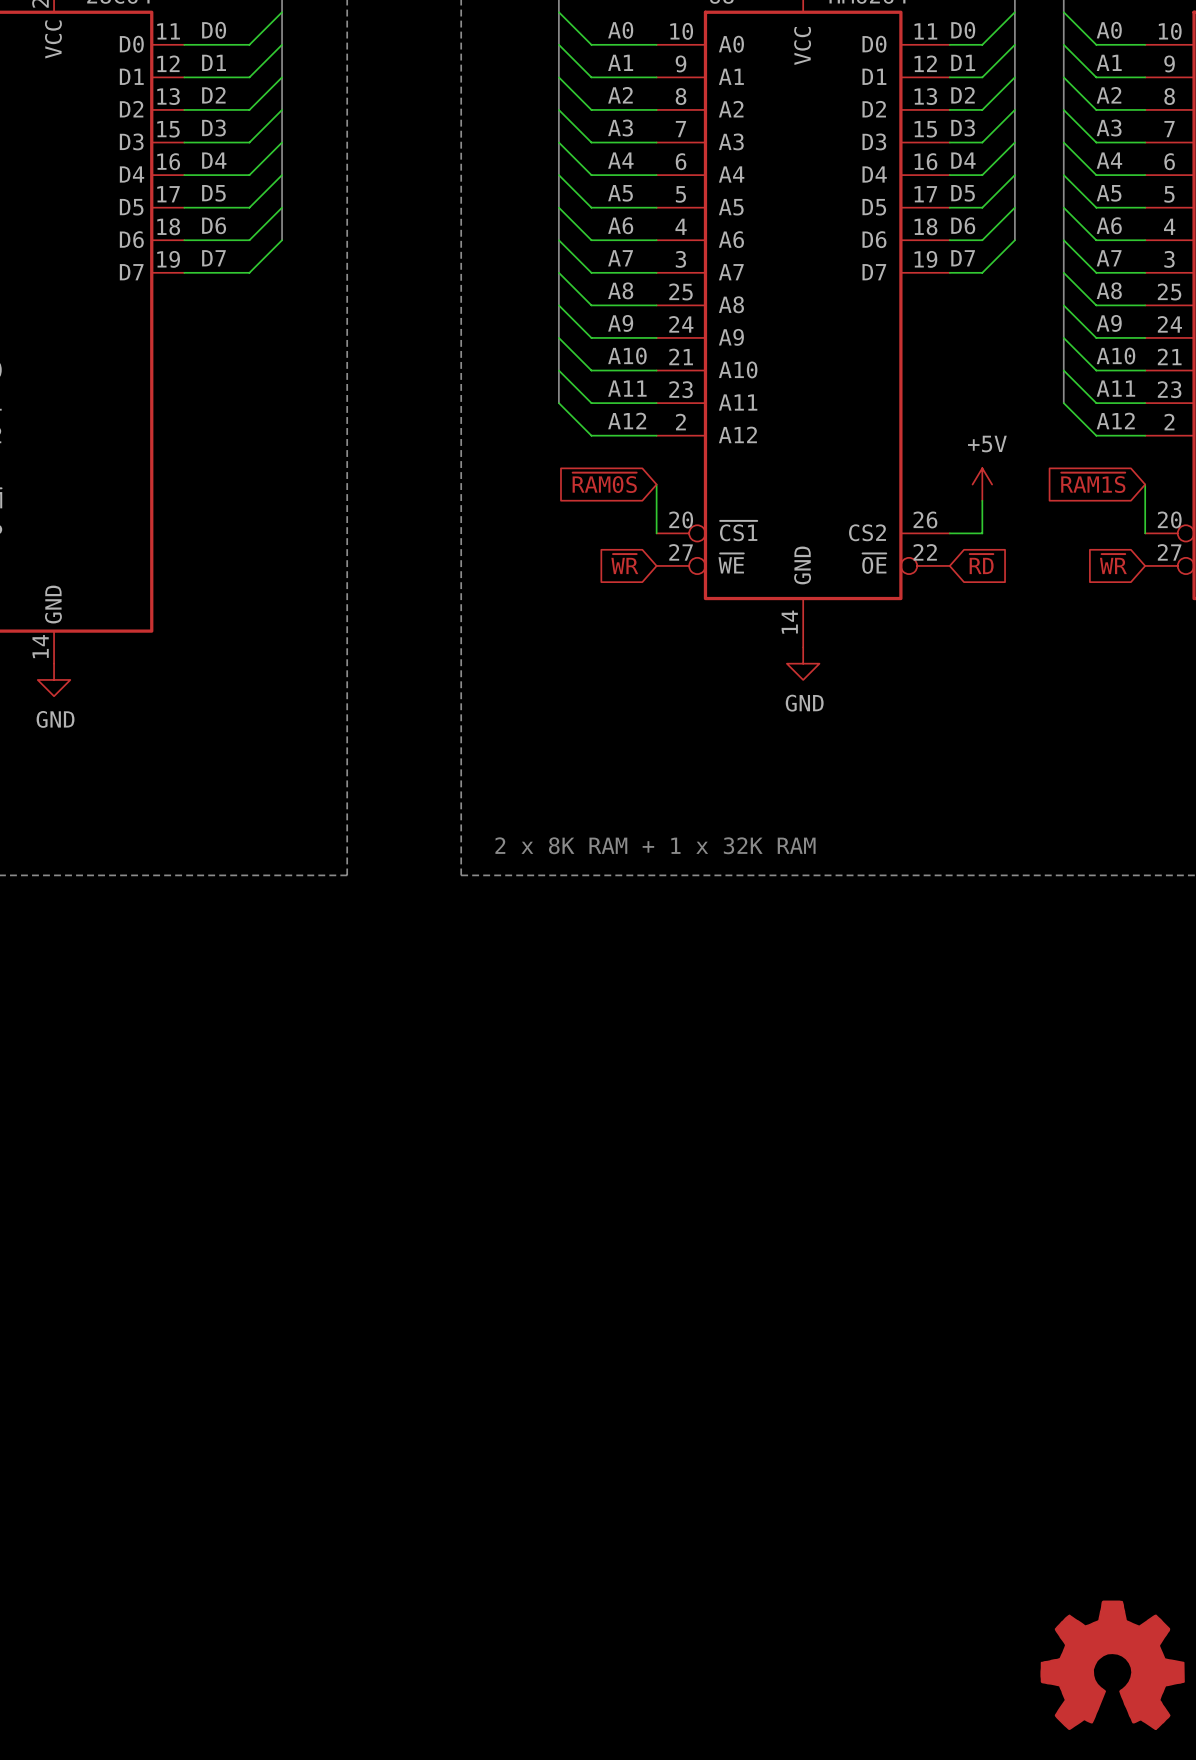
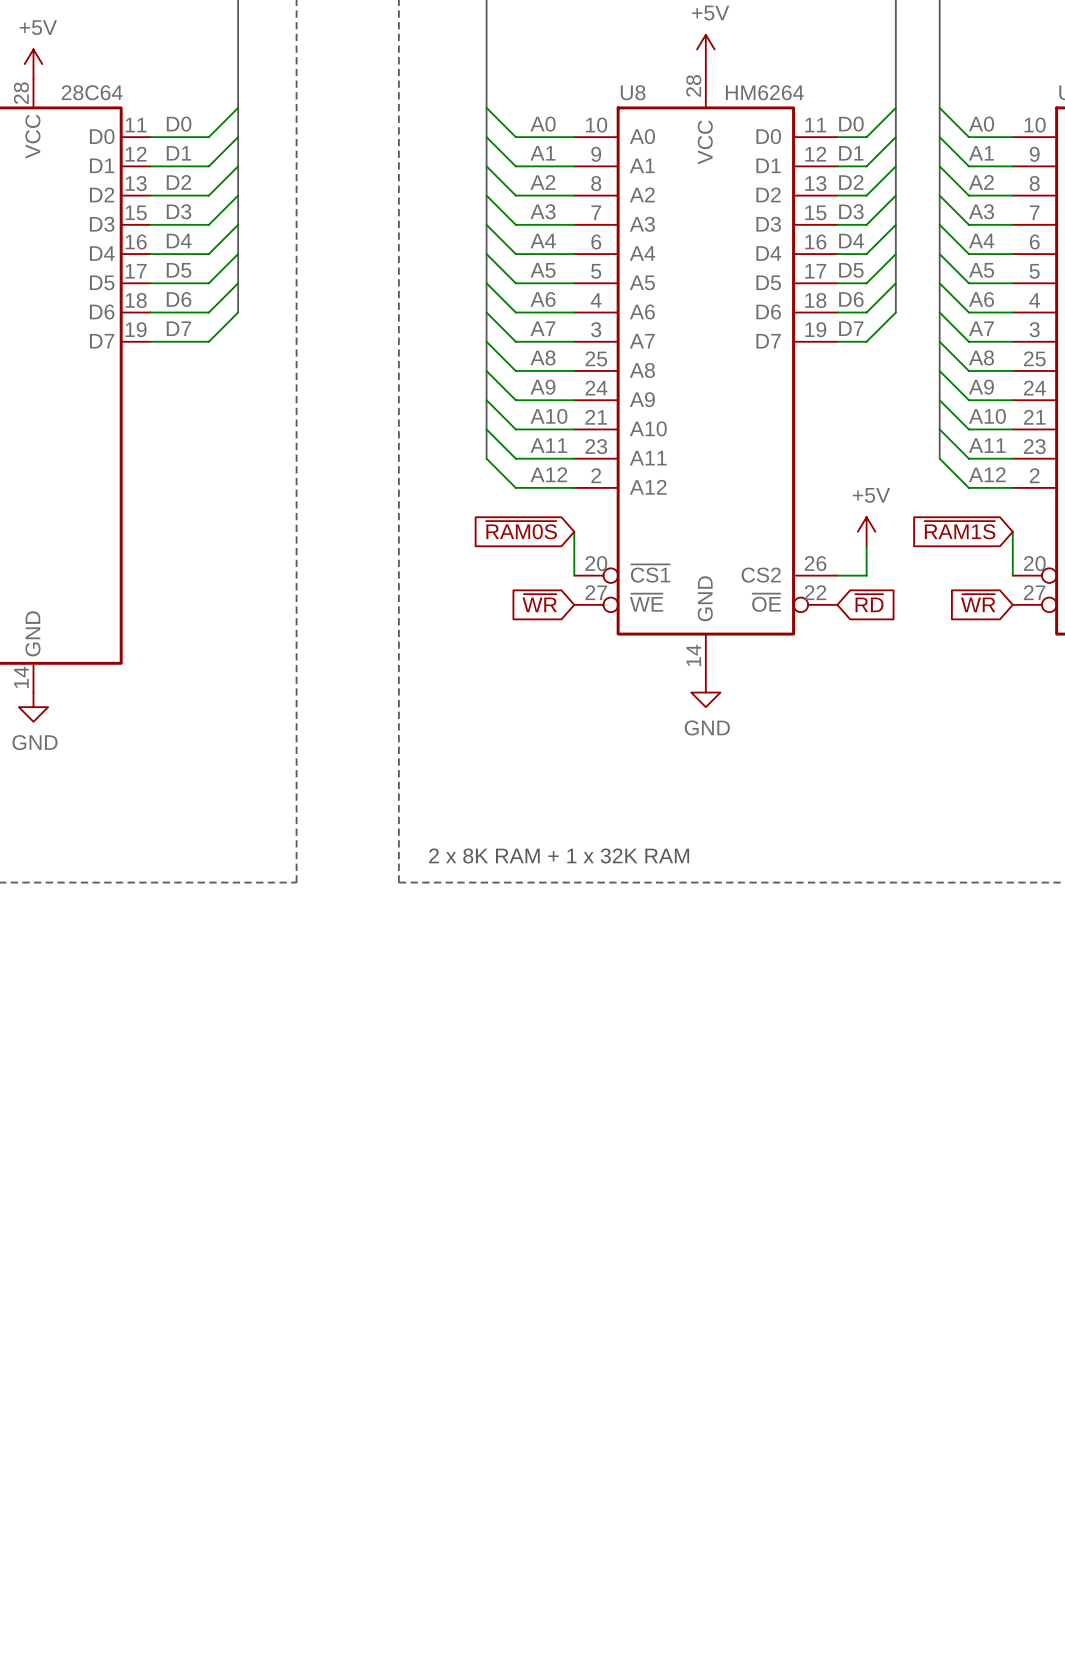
power symbol: (1112, 1665) -> none

